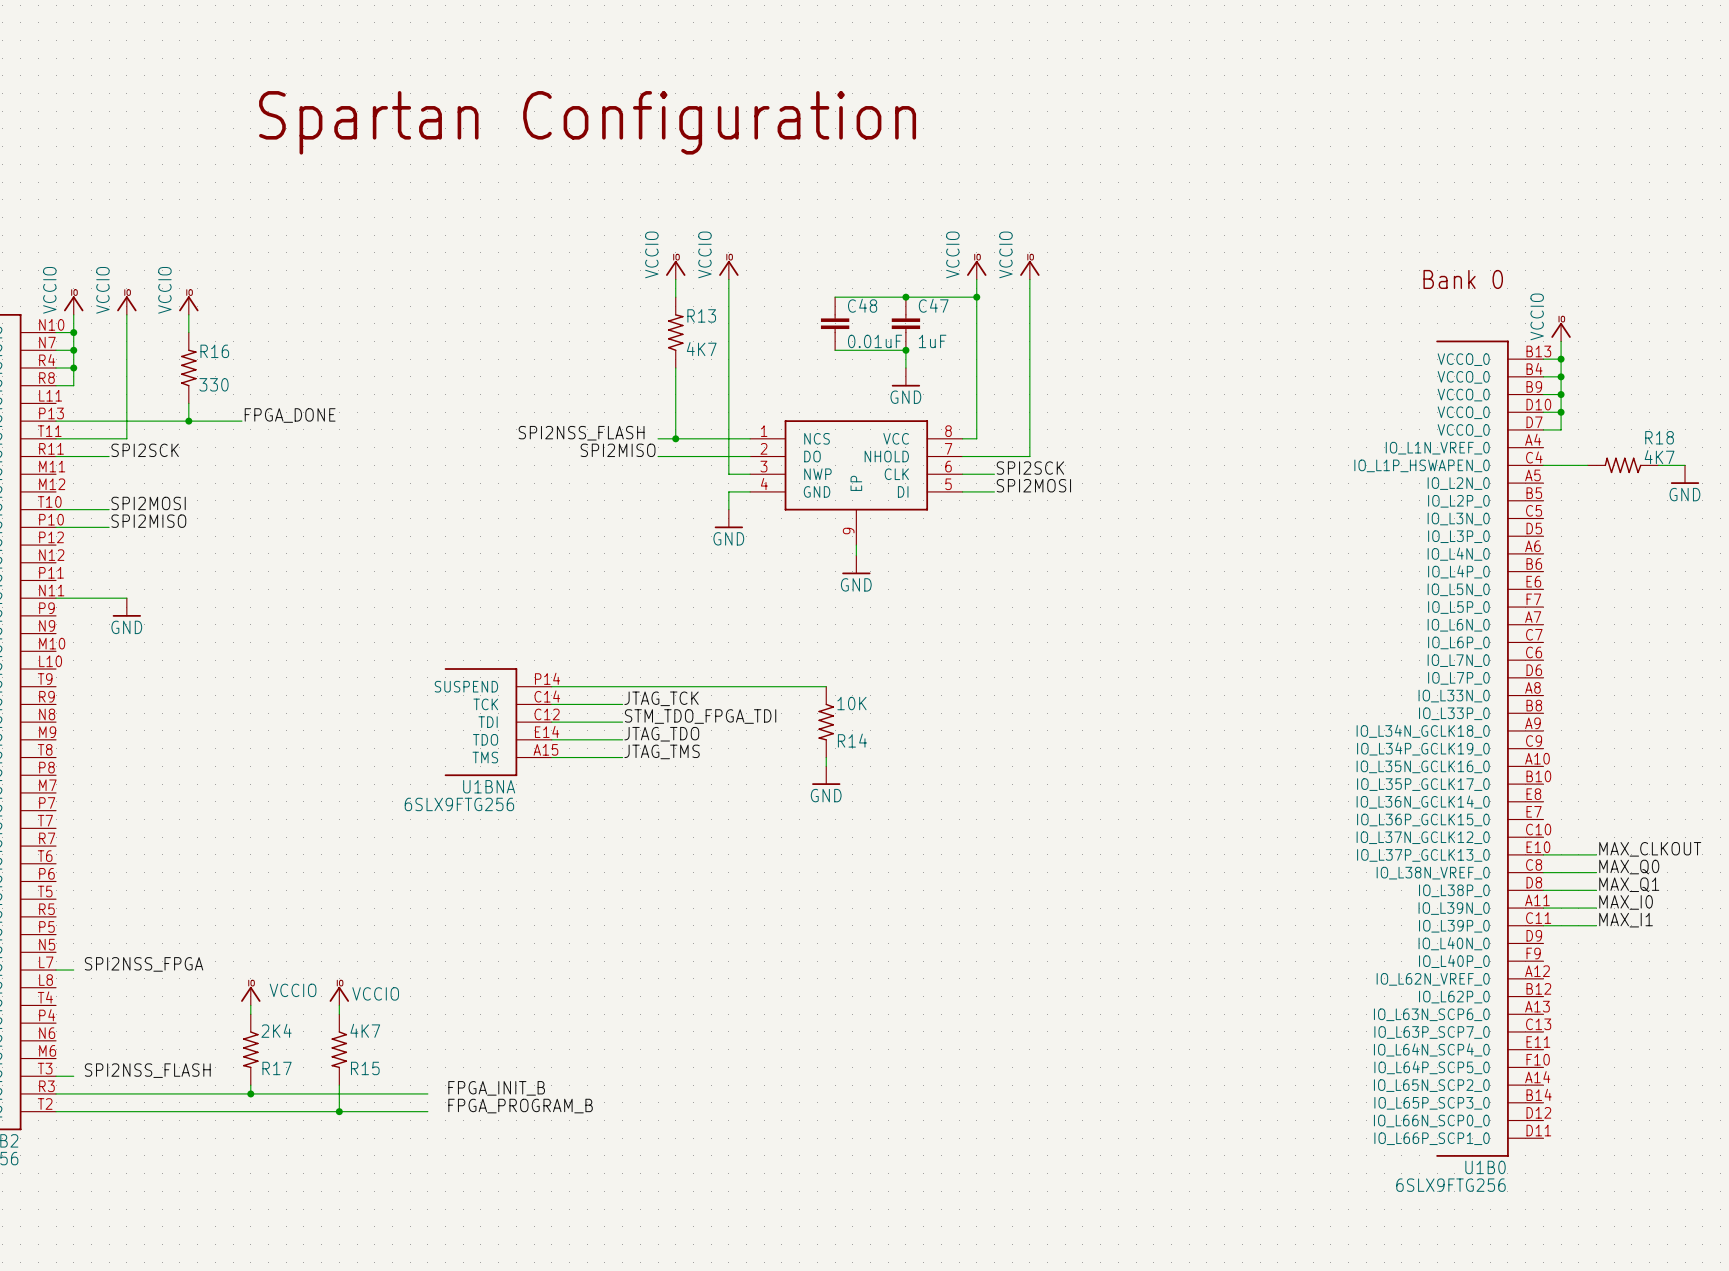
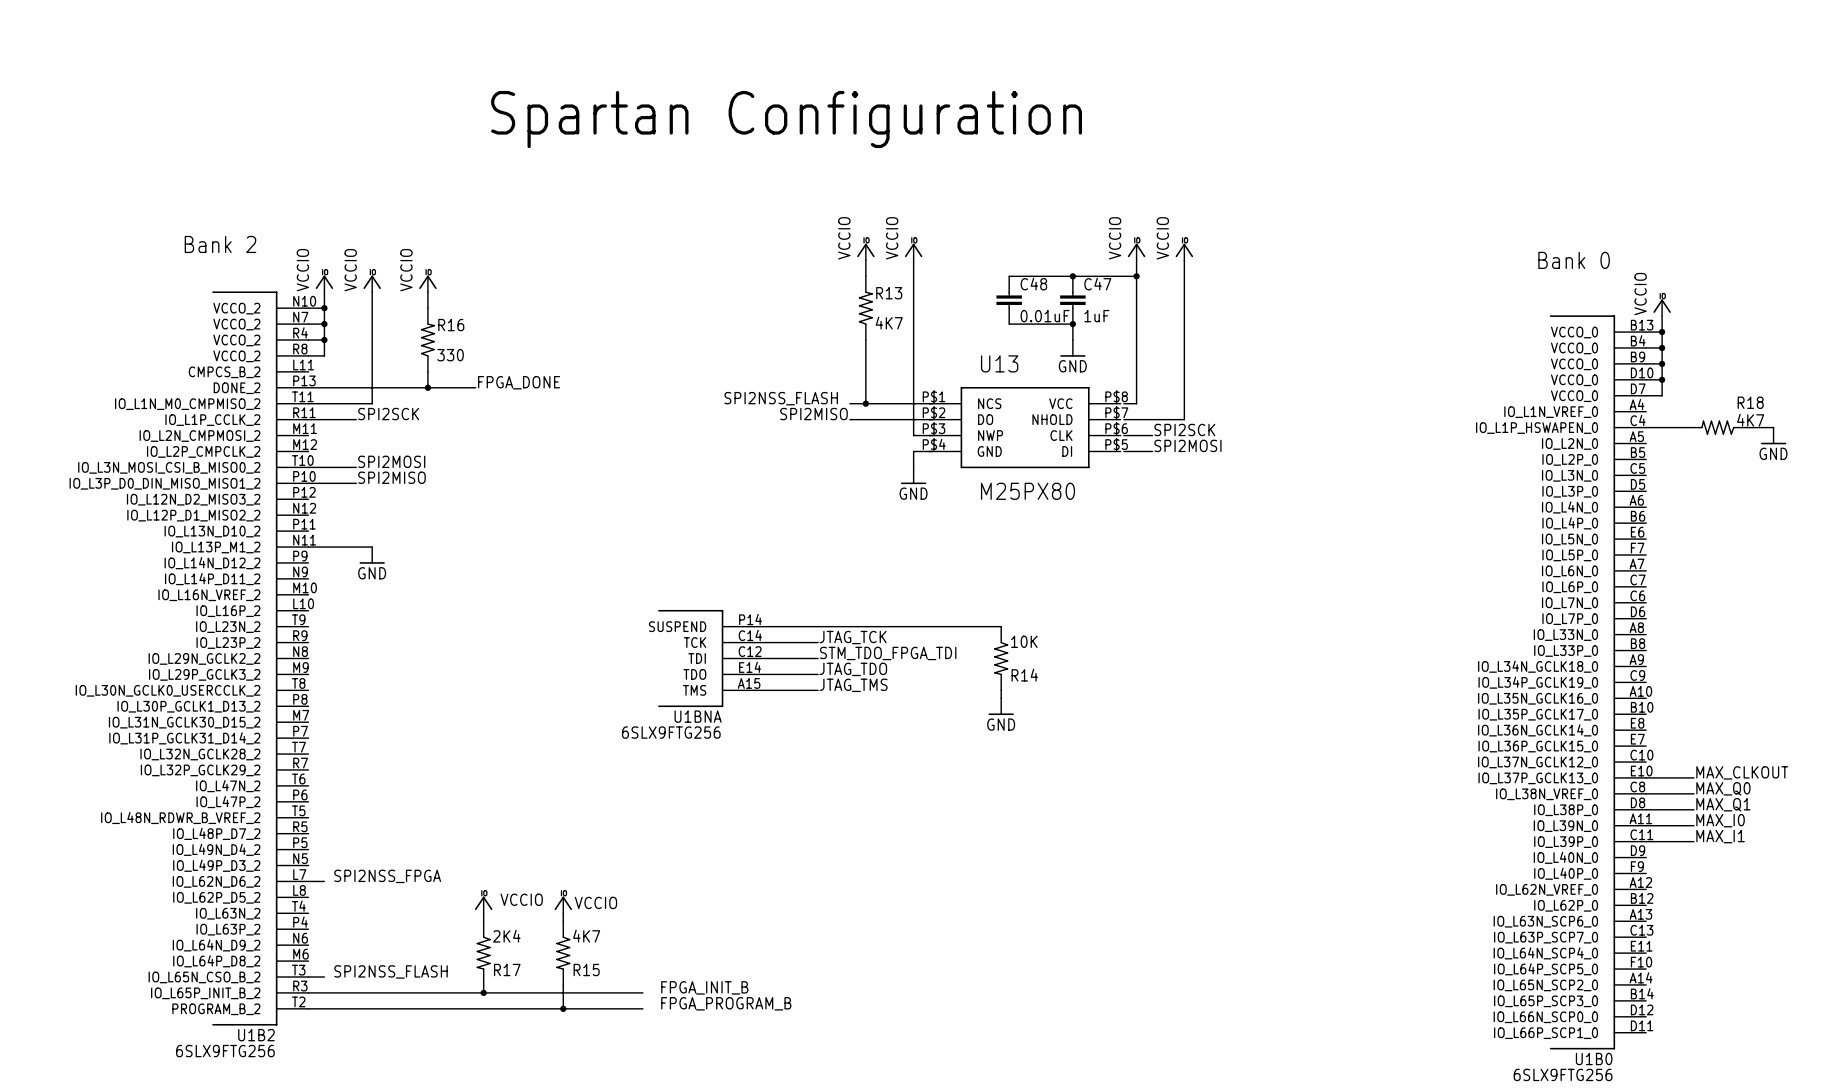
U13: none -> M25PX80 (1025, 427)
part: (856, 482) -> none
wire: (856, 545) (856, 555) -> none
power symbol: GND (856, 564) -> none

